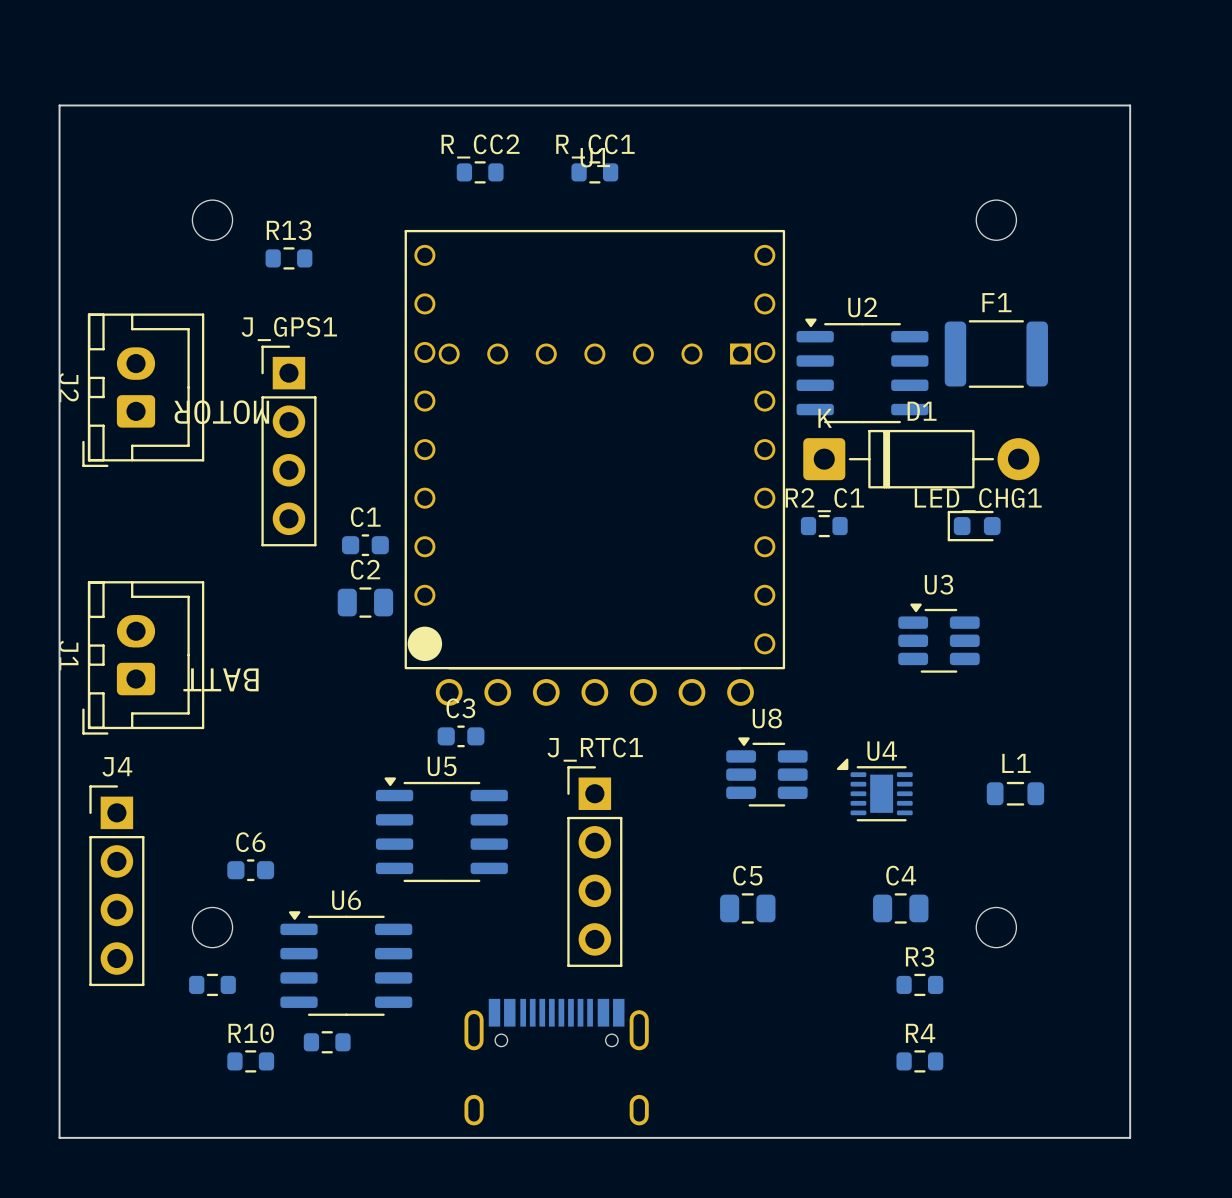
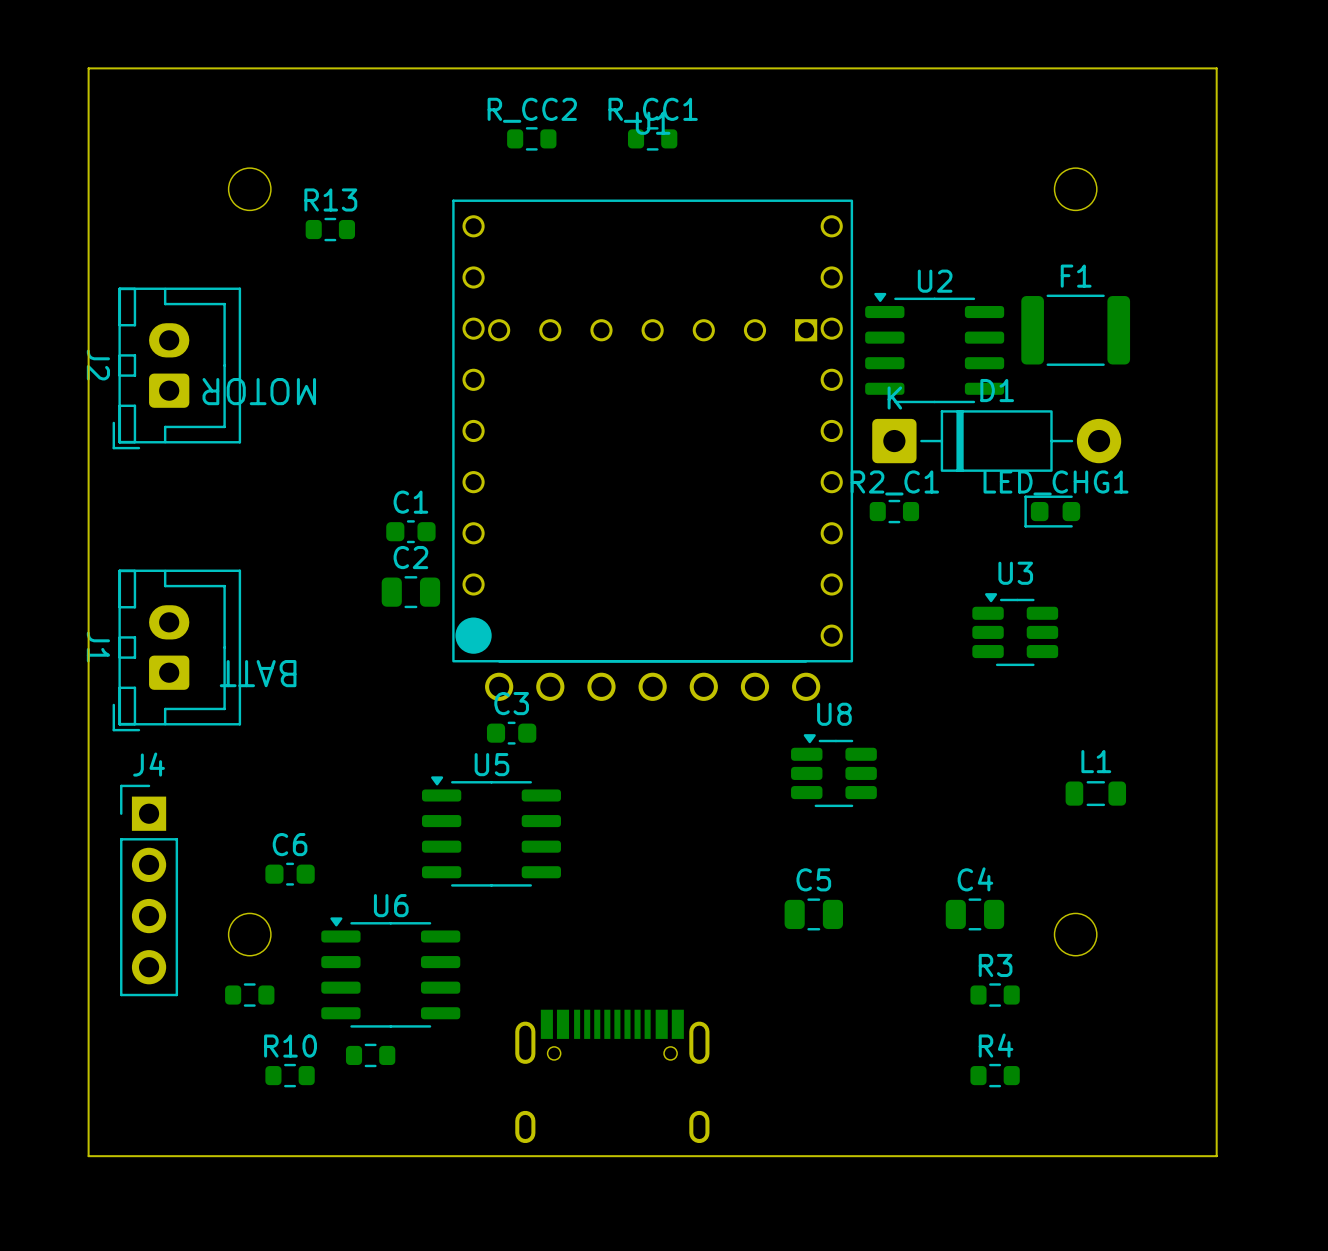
J_GPS1: (288, 445) -> none
U4: (874, 789) -> none
J_RTC1: (594, 866) -> none

